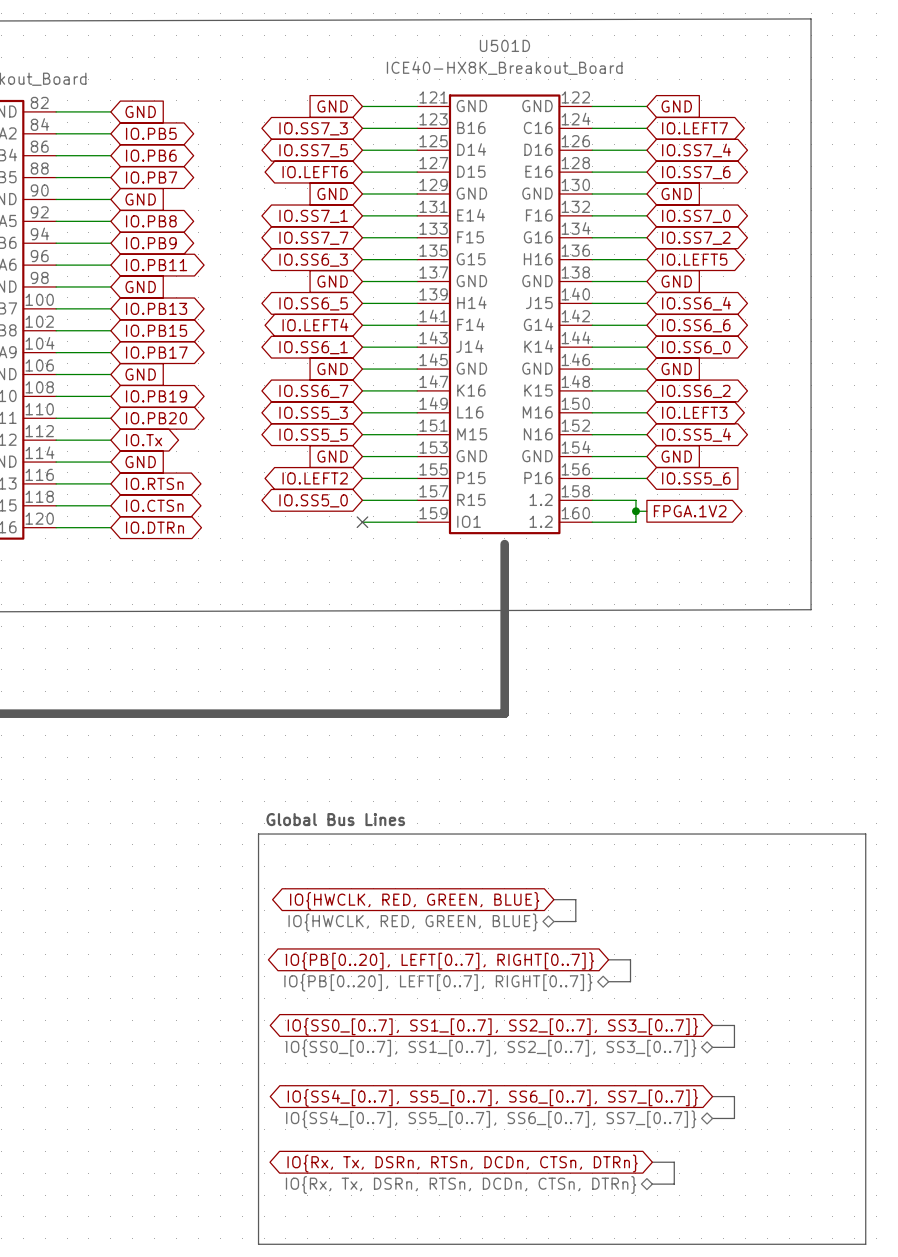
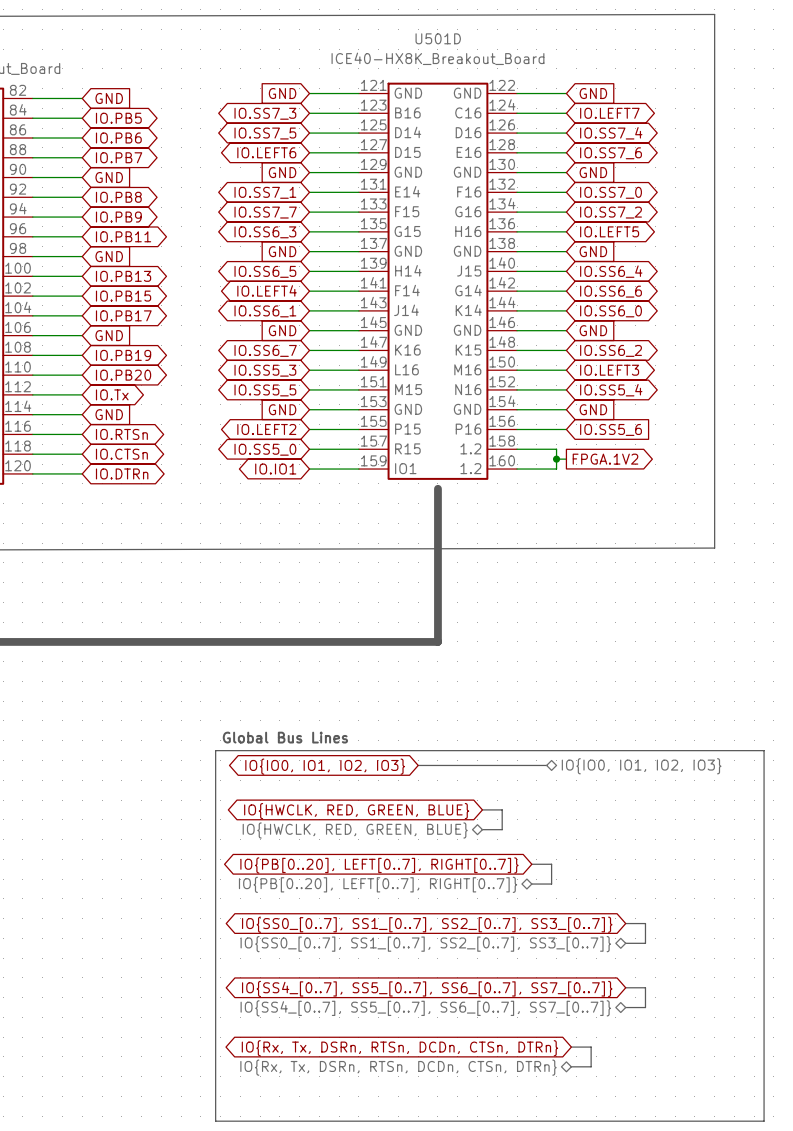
global label: none -> IO.IO1 (275, 469)
no-connect mark: (362, 522) -> none
bus: none -> (418, 765) (546, 765)
global label: none -> IO{IO0, IO1, IO2, IO3} (325, 766)
hierarchical label: none -> IO{IO0, IO1, IO2, IO3} (641, 766)

